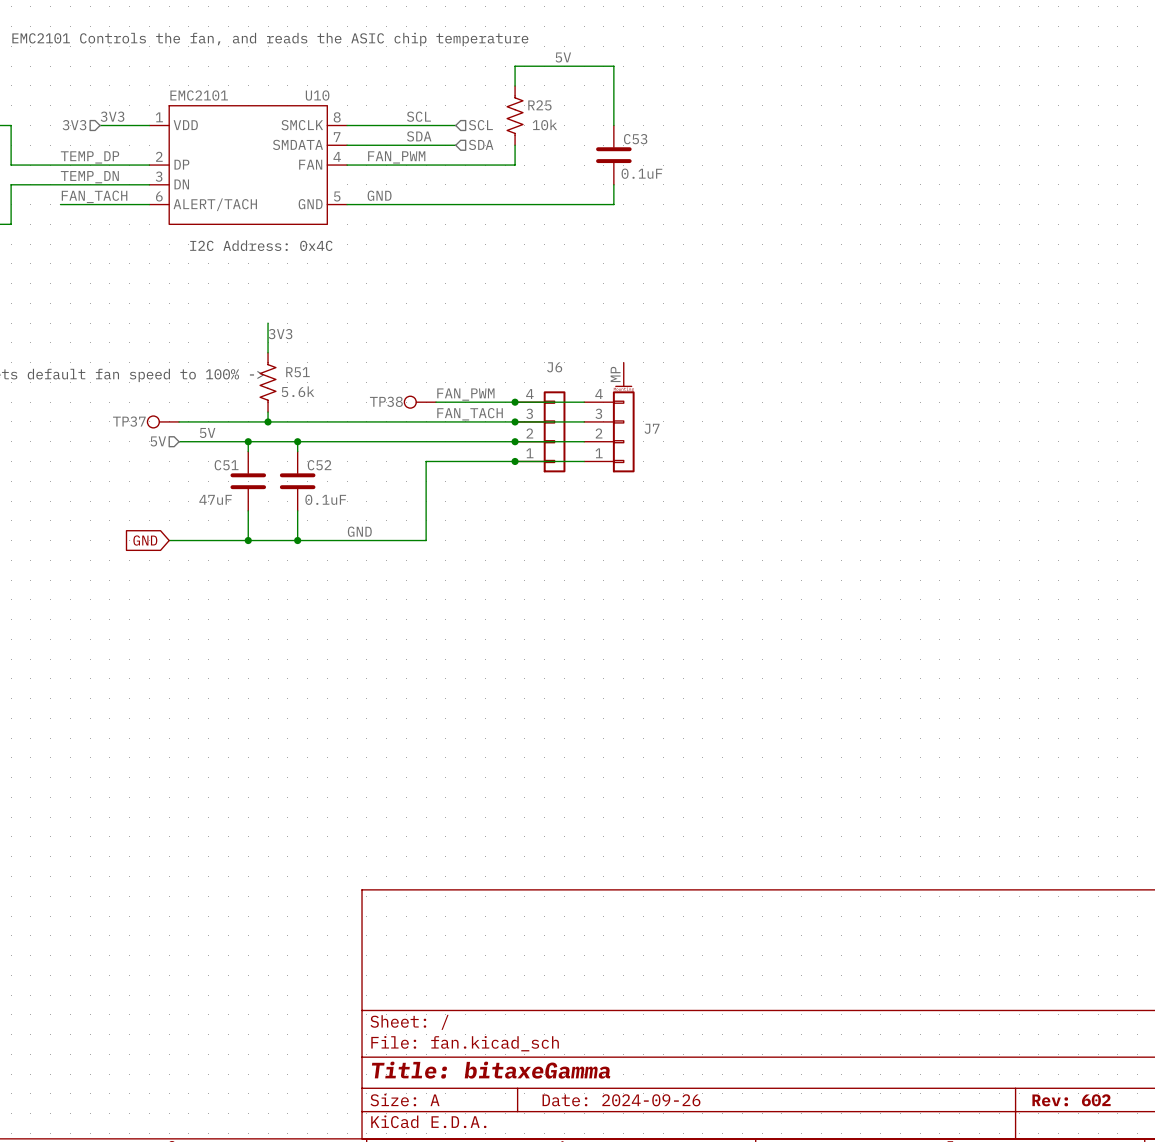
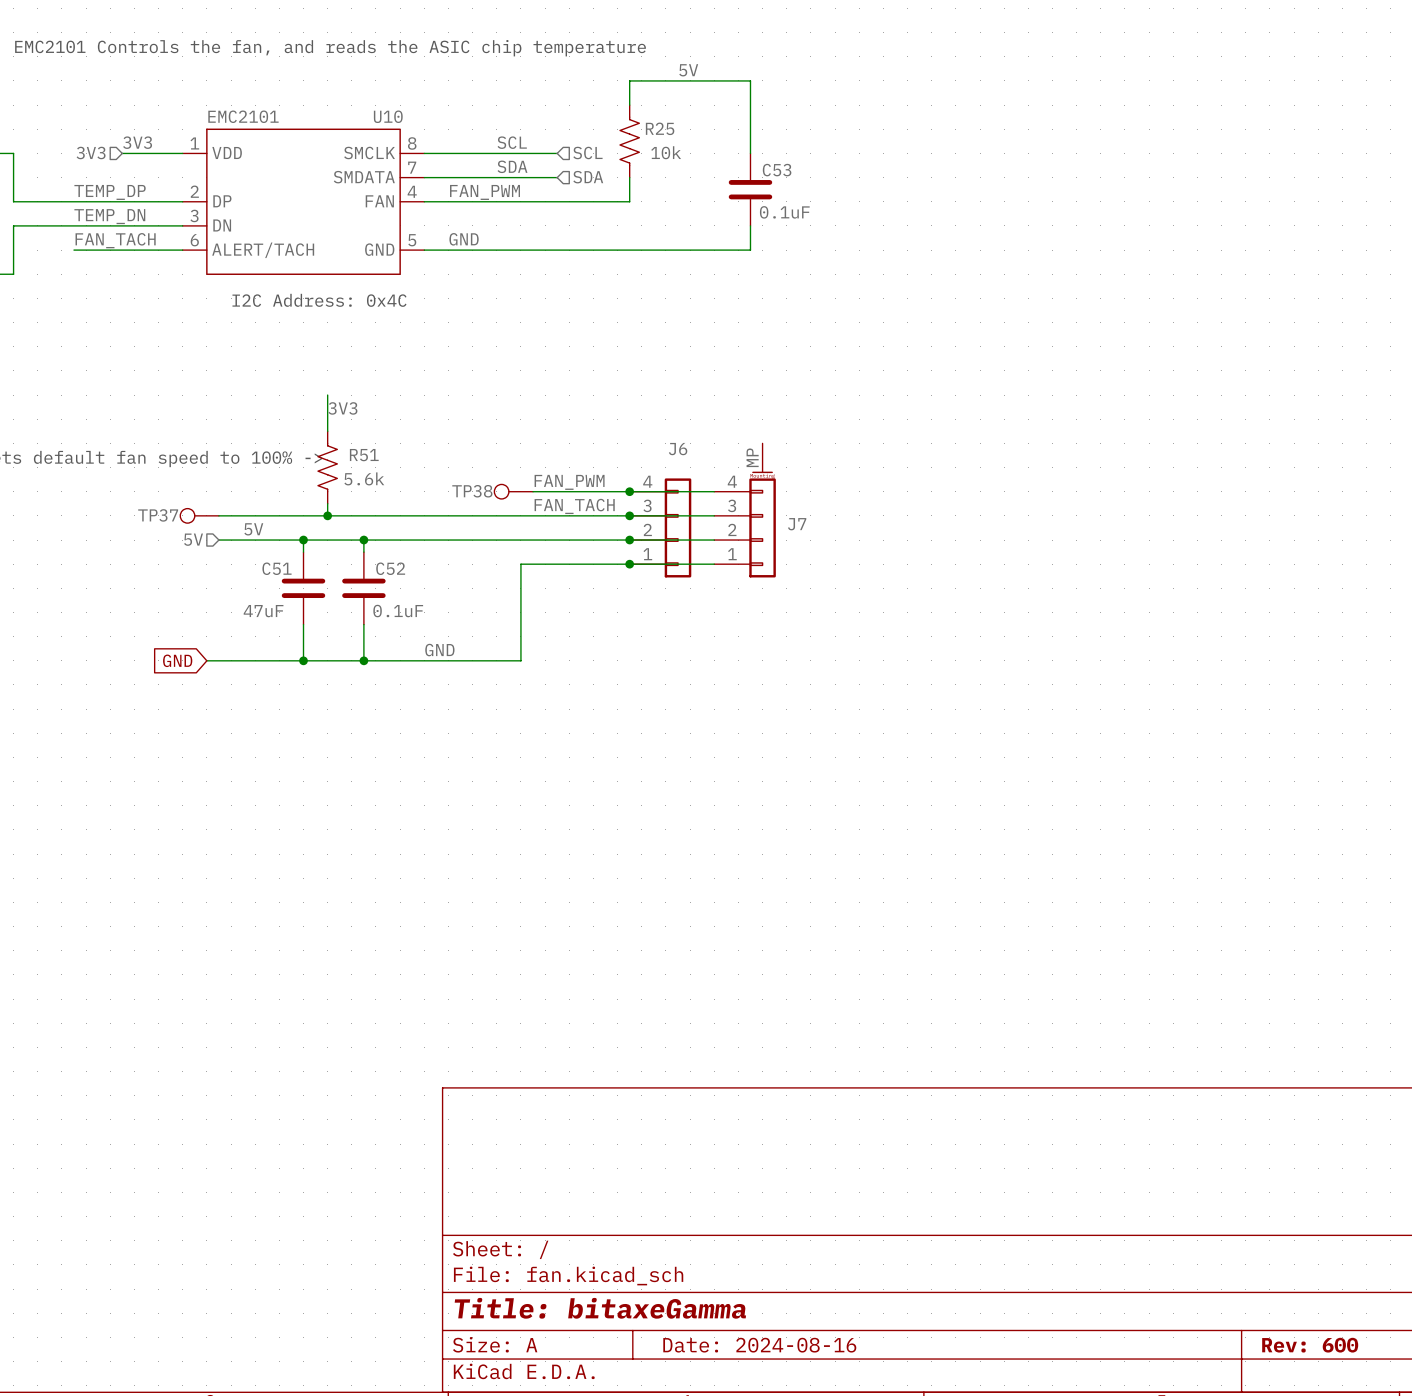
title block: Date: 2024-09-26 (621, 1100) -> Date: 2024-08-16 (759, 1345)
title block: Rev: 602 (1071, 1100) -> Rev: 600 (1310, 1345)

